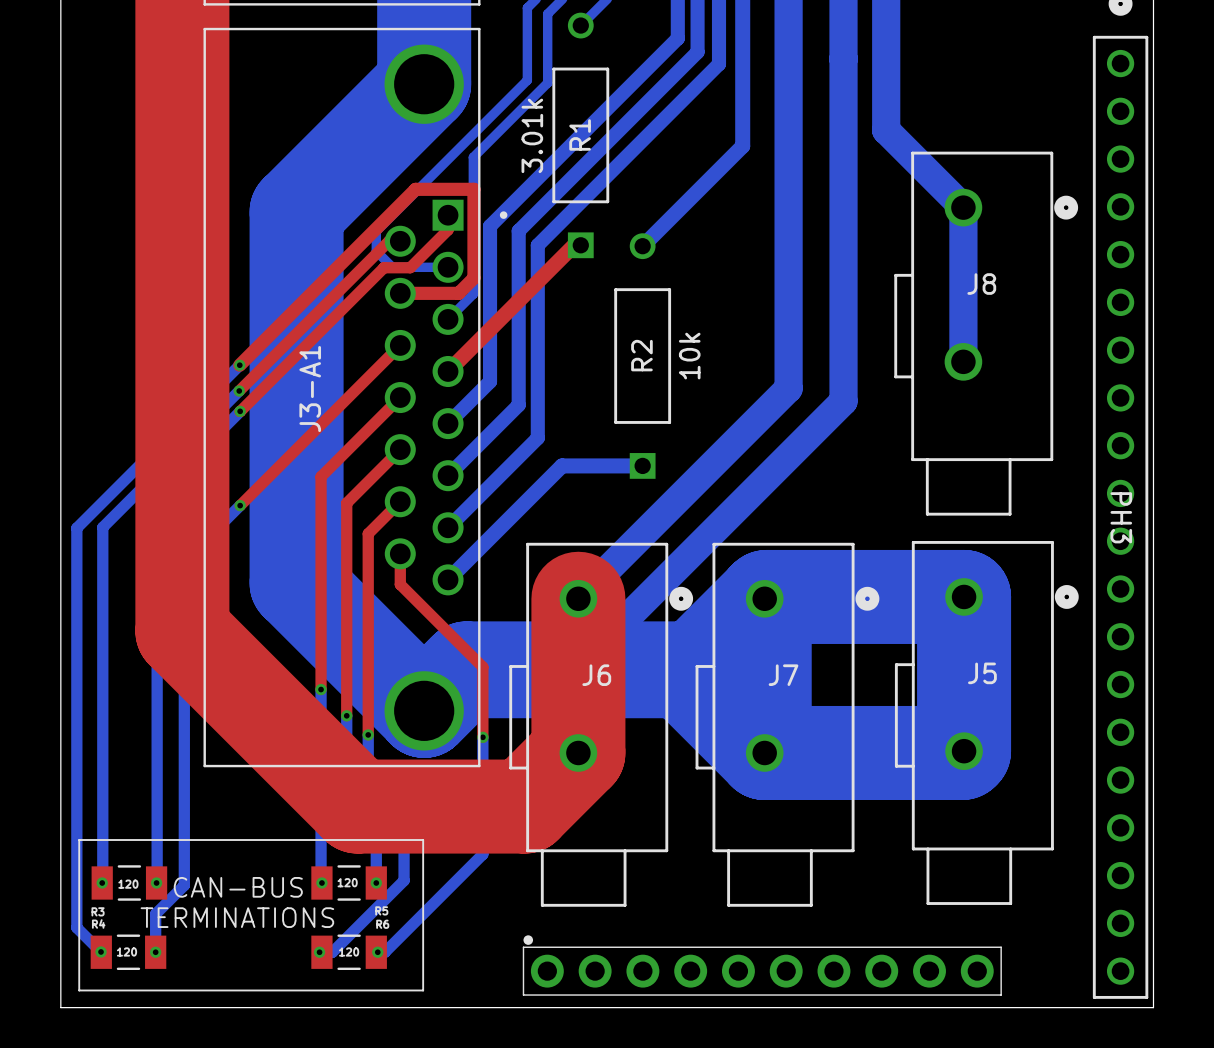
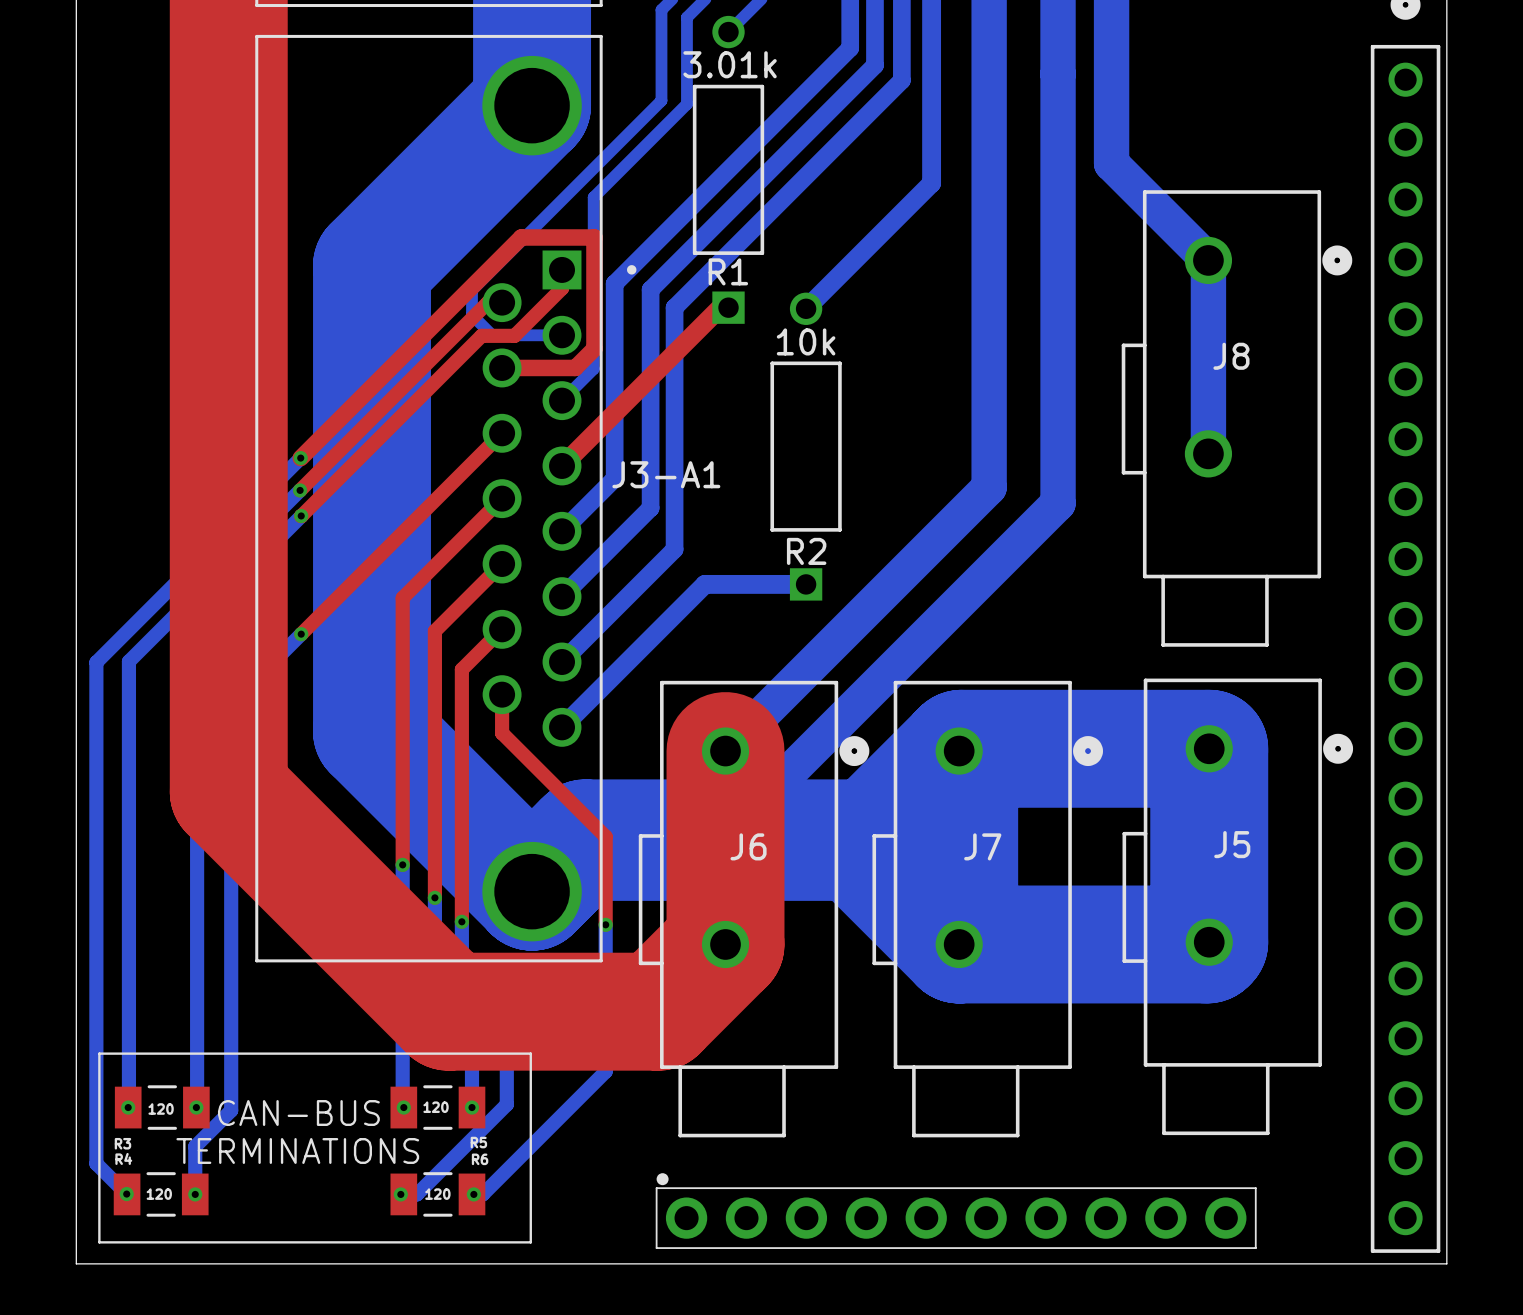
R1 name rotation: 0° (580, 134) -> 90° clockwise (728, 271)
R1 name position: R1 (580, 134) -> R1 (728, 271)
R1 value rotation: 0° (532, 135) -> 90° clockwise (730, 64)
R2 name rotation: 0° (641, 355) -> 90° clockwise (806, 551)
R2 name position: R2 (641, 355) -> R2 (806, 551)
R2 value rotation: 0° (689, 356) -> 90° clockwise (806, 341)
R2 value position: 10k (689, 356) -> 10k (806, 341)
J3-A1 name rotation: 0° (310, 389) -> 90° clockwise (666, 474)
J3-A1 name position: J3-A1 (310, 389) -> J3-A1 (666, 474)
PH3 name: PH3 (1121, 517) -> none

